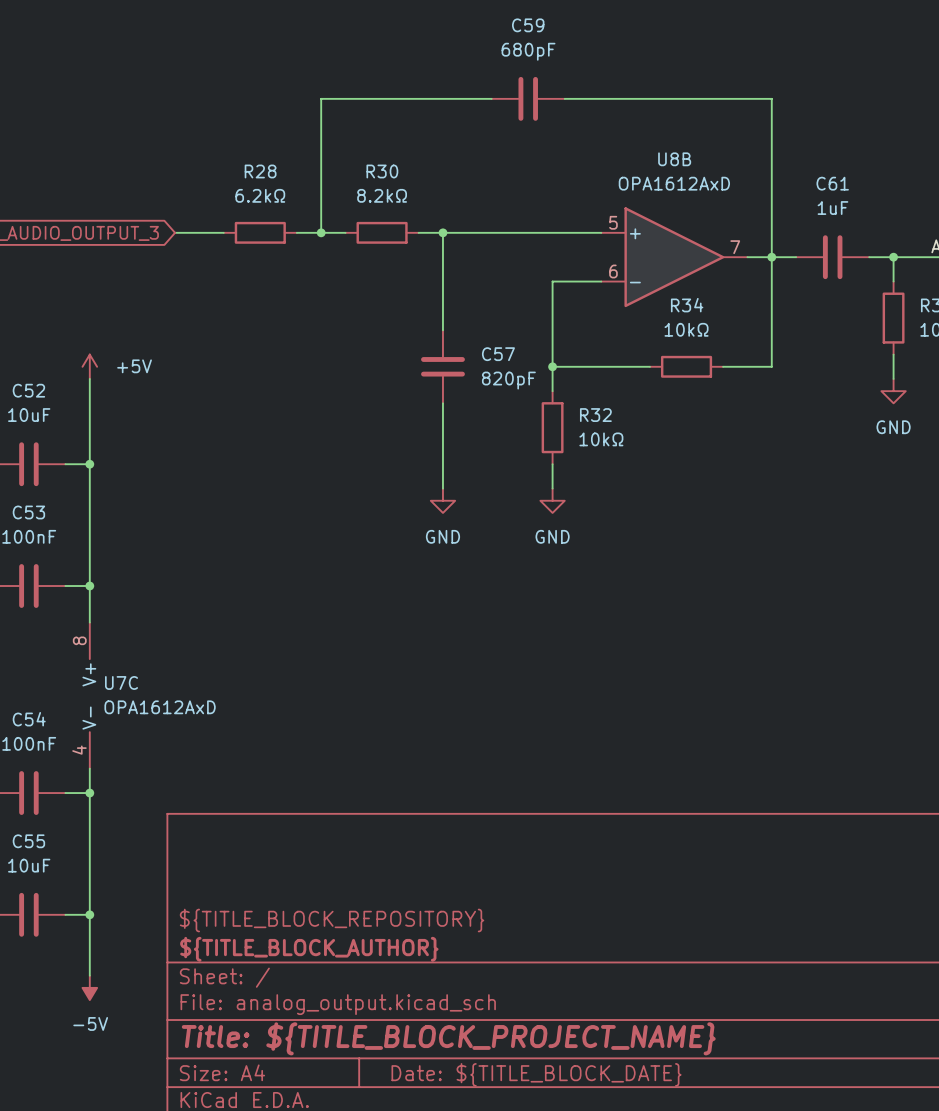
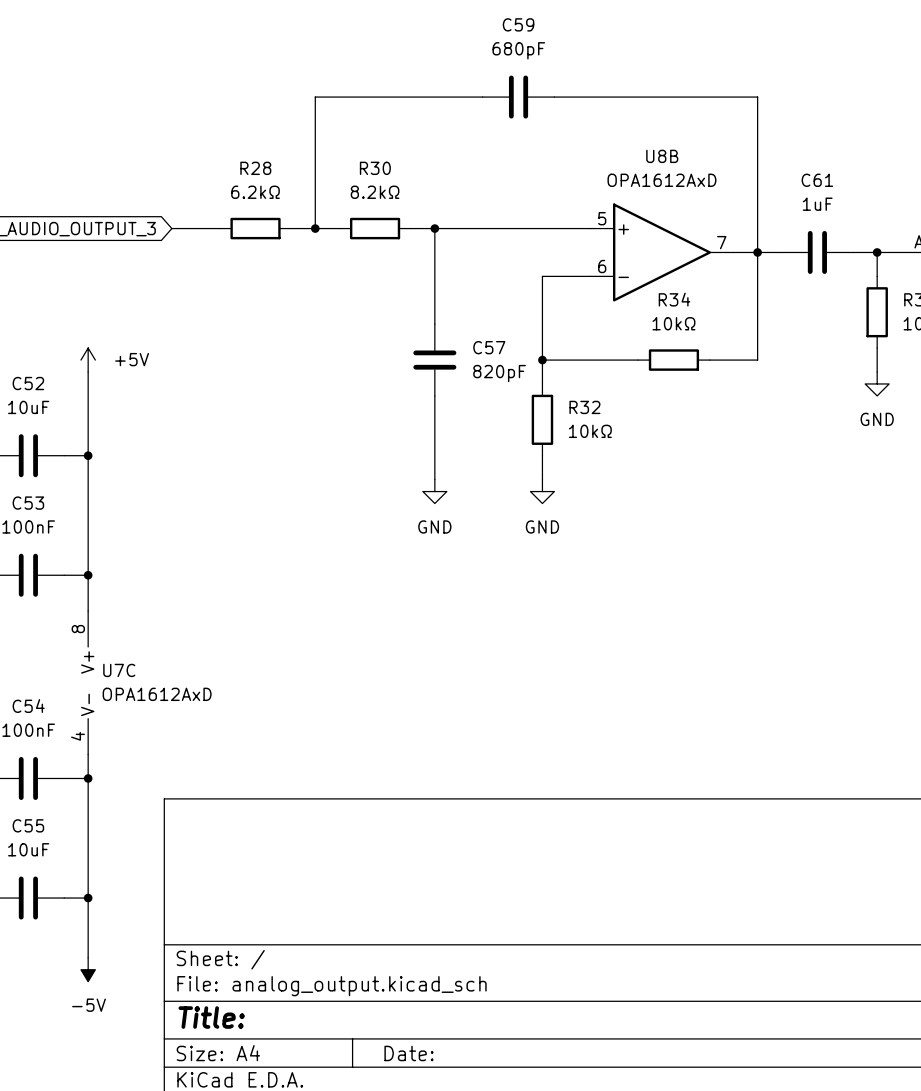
title block: ${TITLE_BLOCK_REPOSITORY} (332, 920) -> none
title block: ${TITLE_BLOCK_AUTHOR} (309, 949) -> none
title block: Title: ${TITLE_BLOCK_PROJECT_NAME} (448, 1038) -> Title: (211, 1017)
title block: Date: ${TITLE_BLOCK_DATE} (536, 1074) -> Date: (408, 1053)

